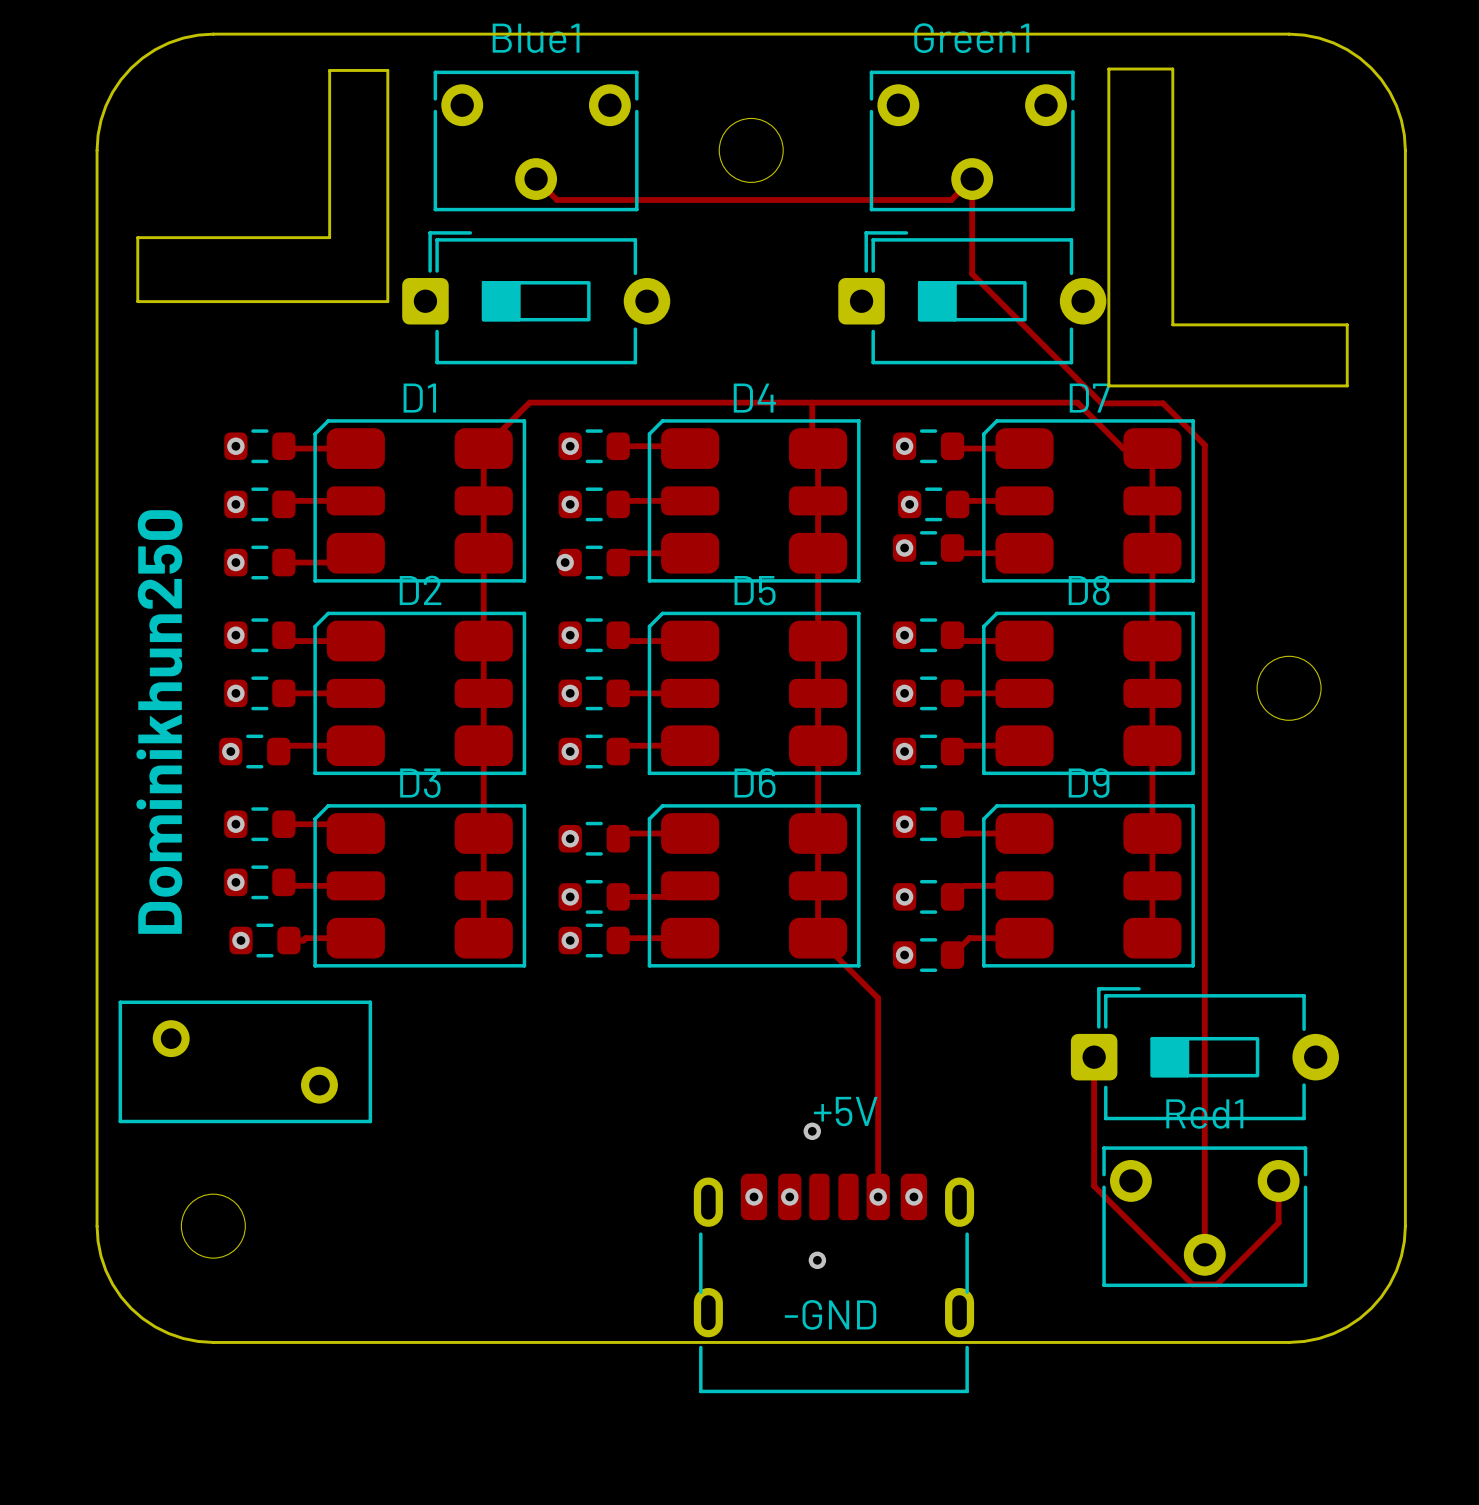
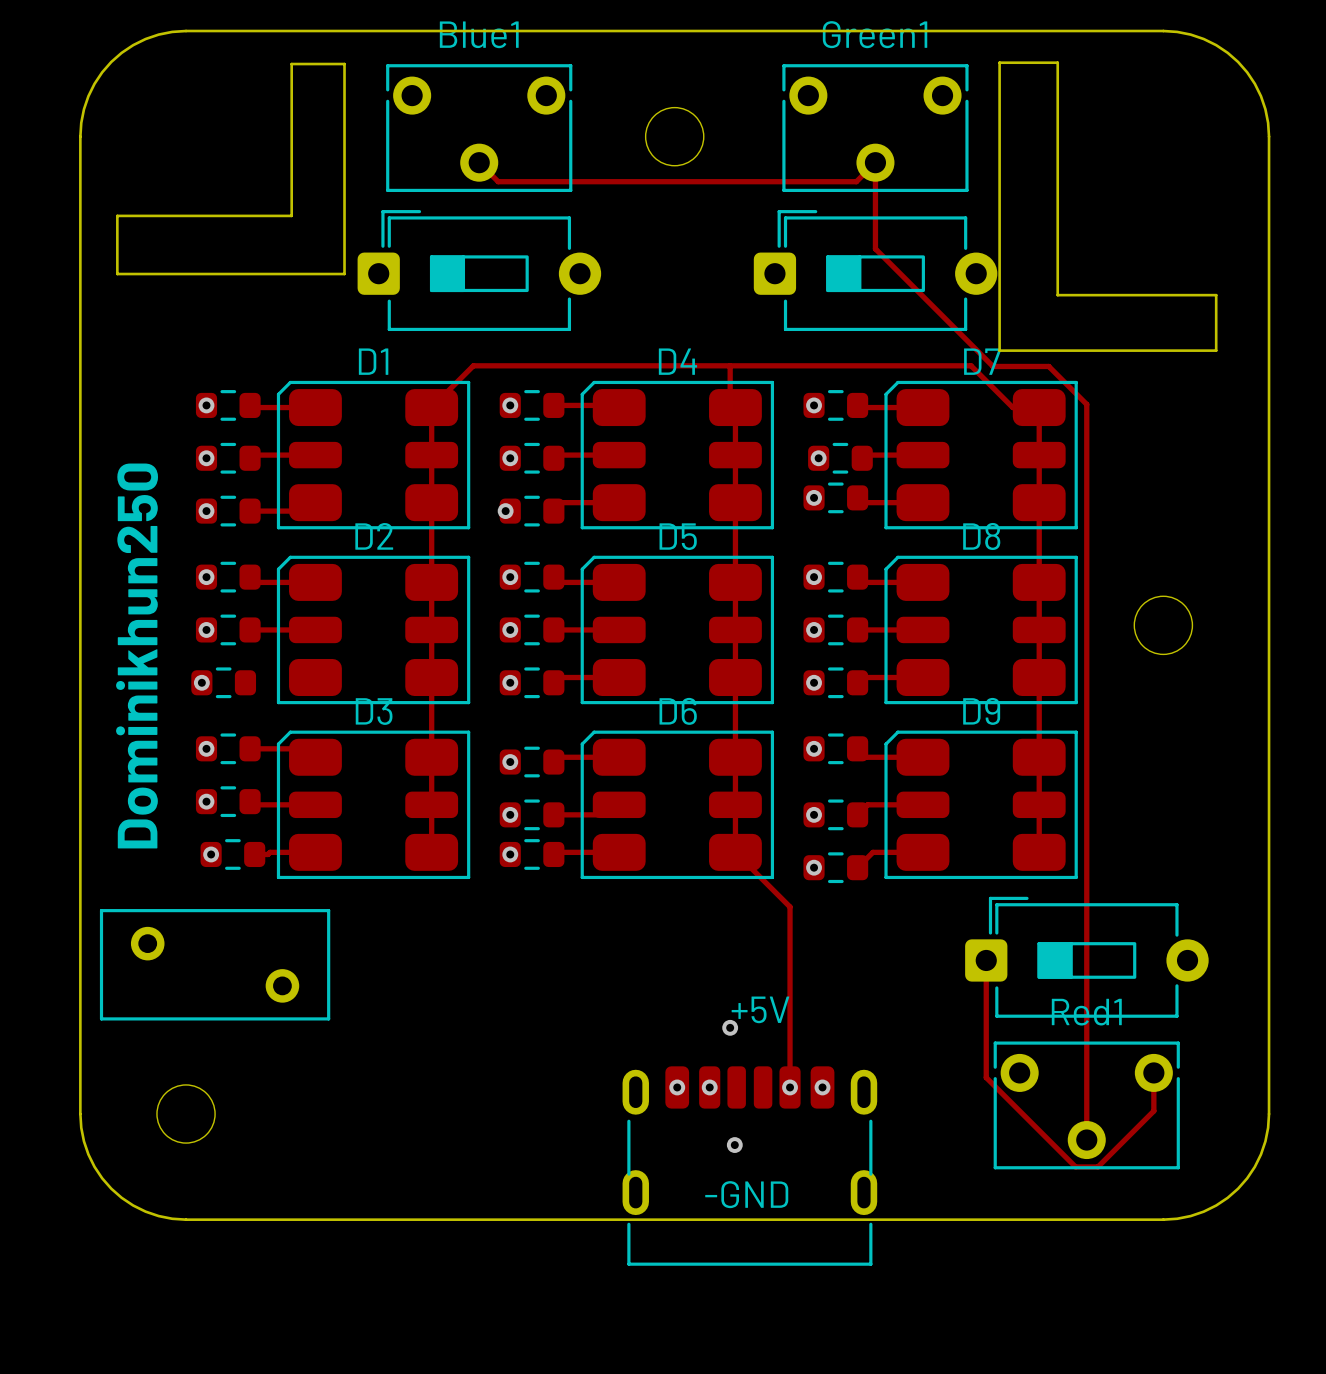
track: (355, 745) (284, 745) (278, 751) -> none

